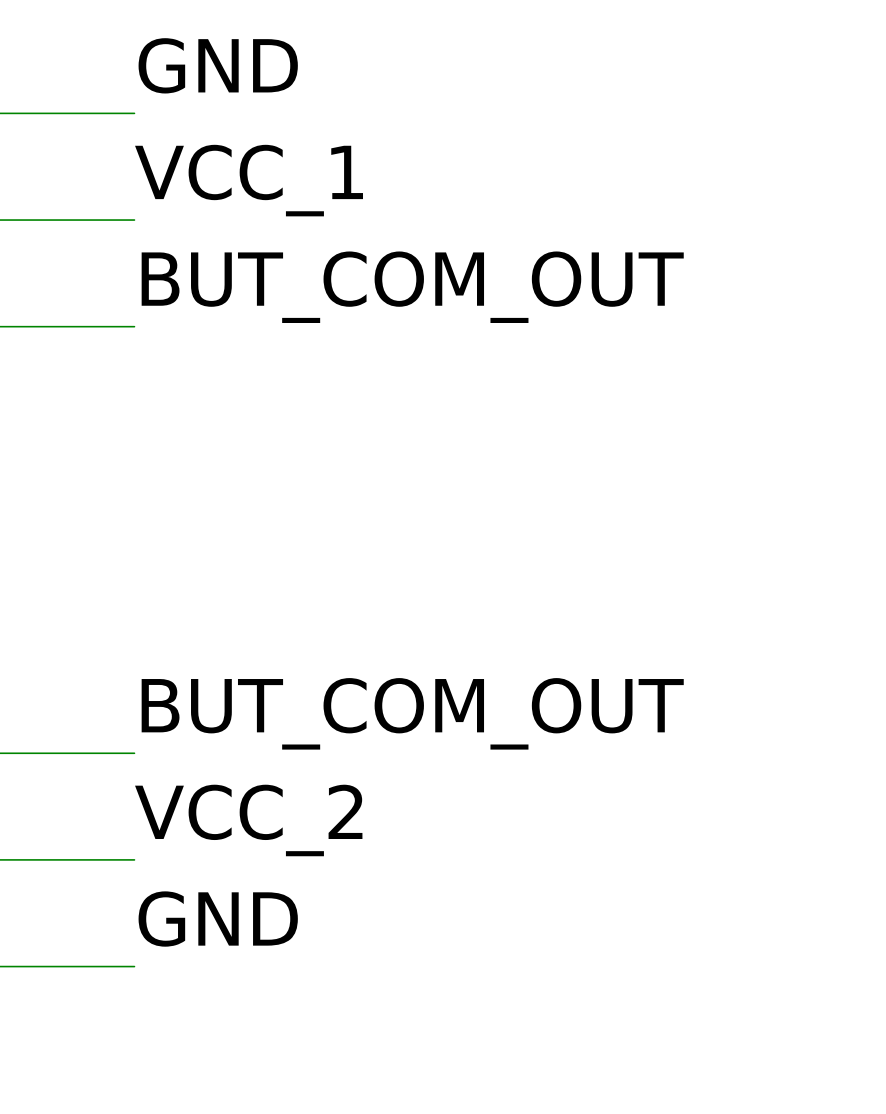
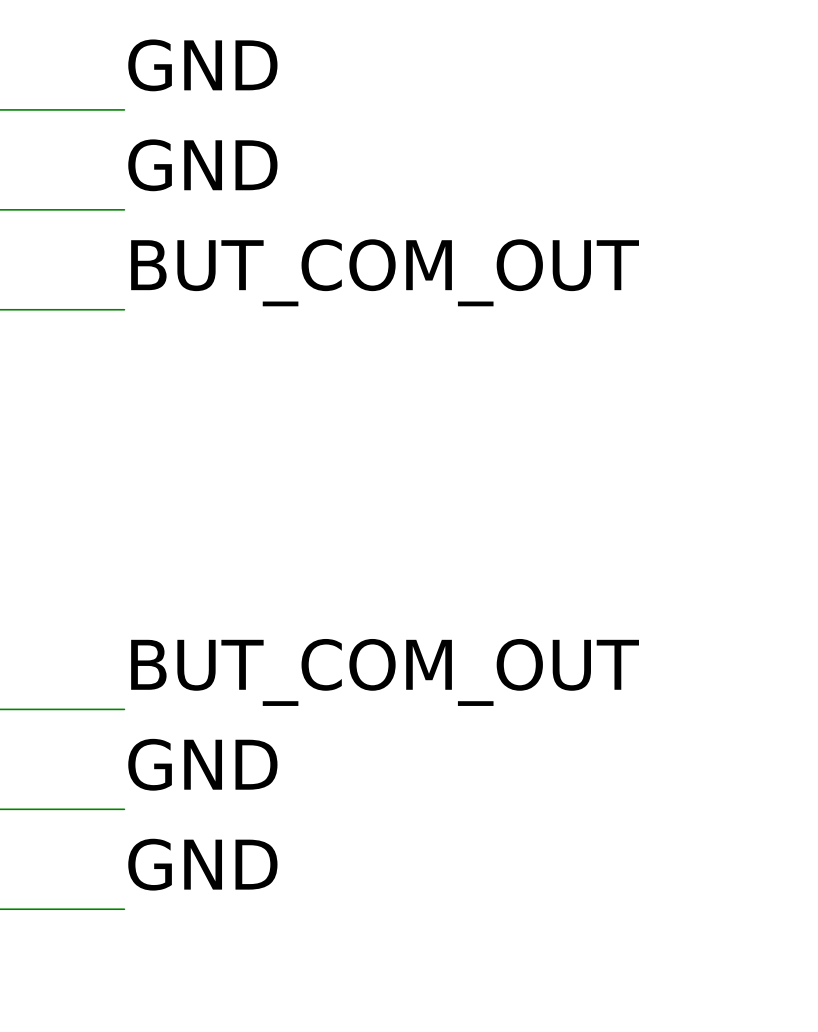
label: VCC_1 (249, 180) -> GND (202, 165)
label: VCC_2 (248, 820) -> GND (202, 764)

